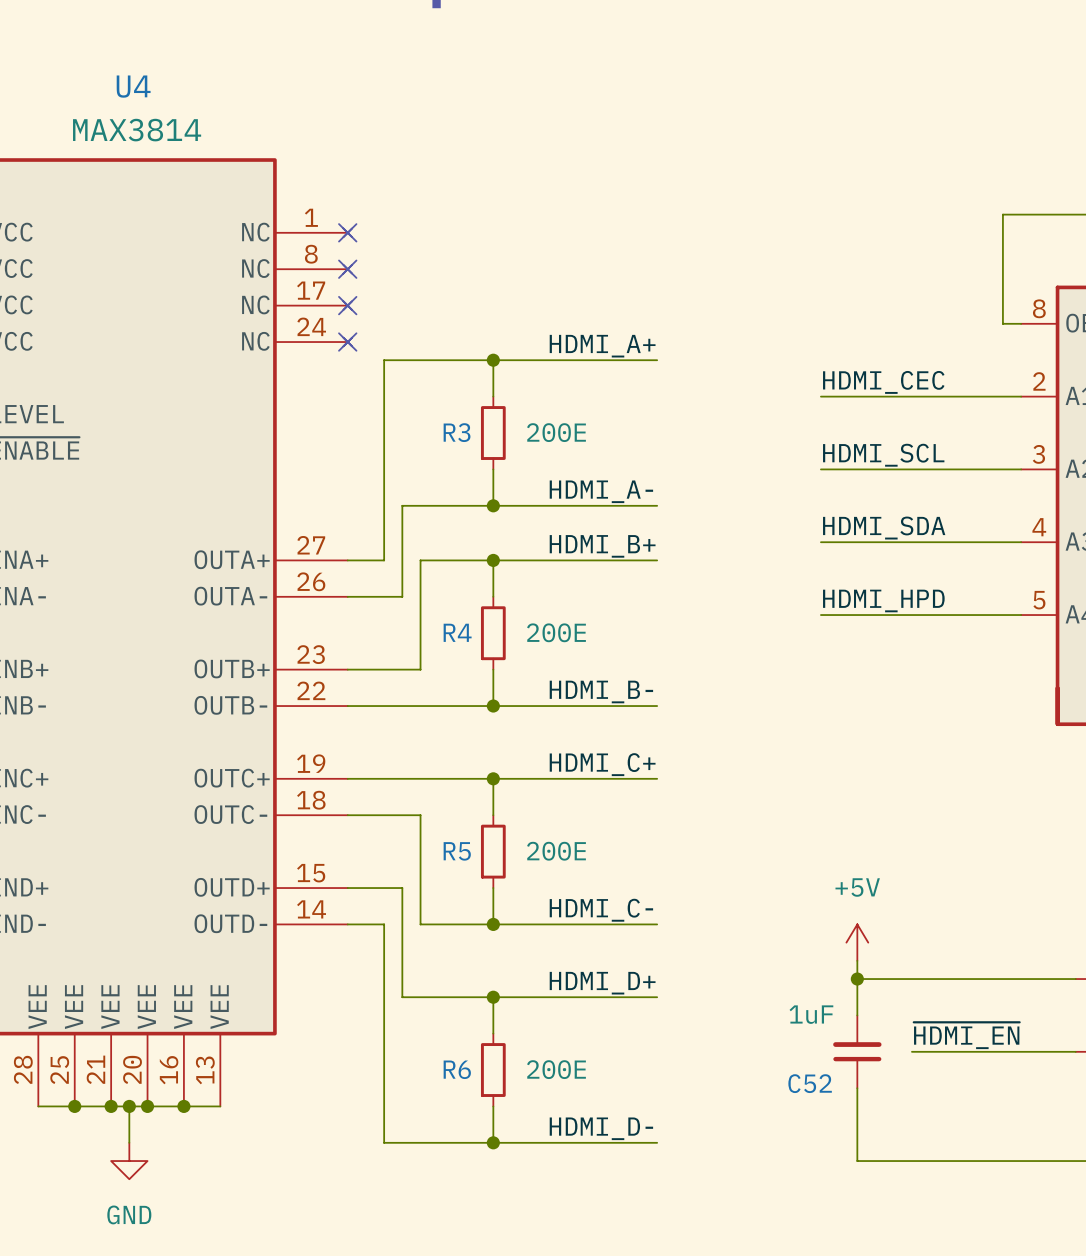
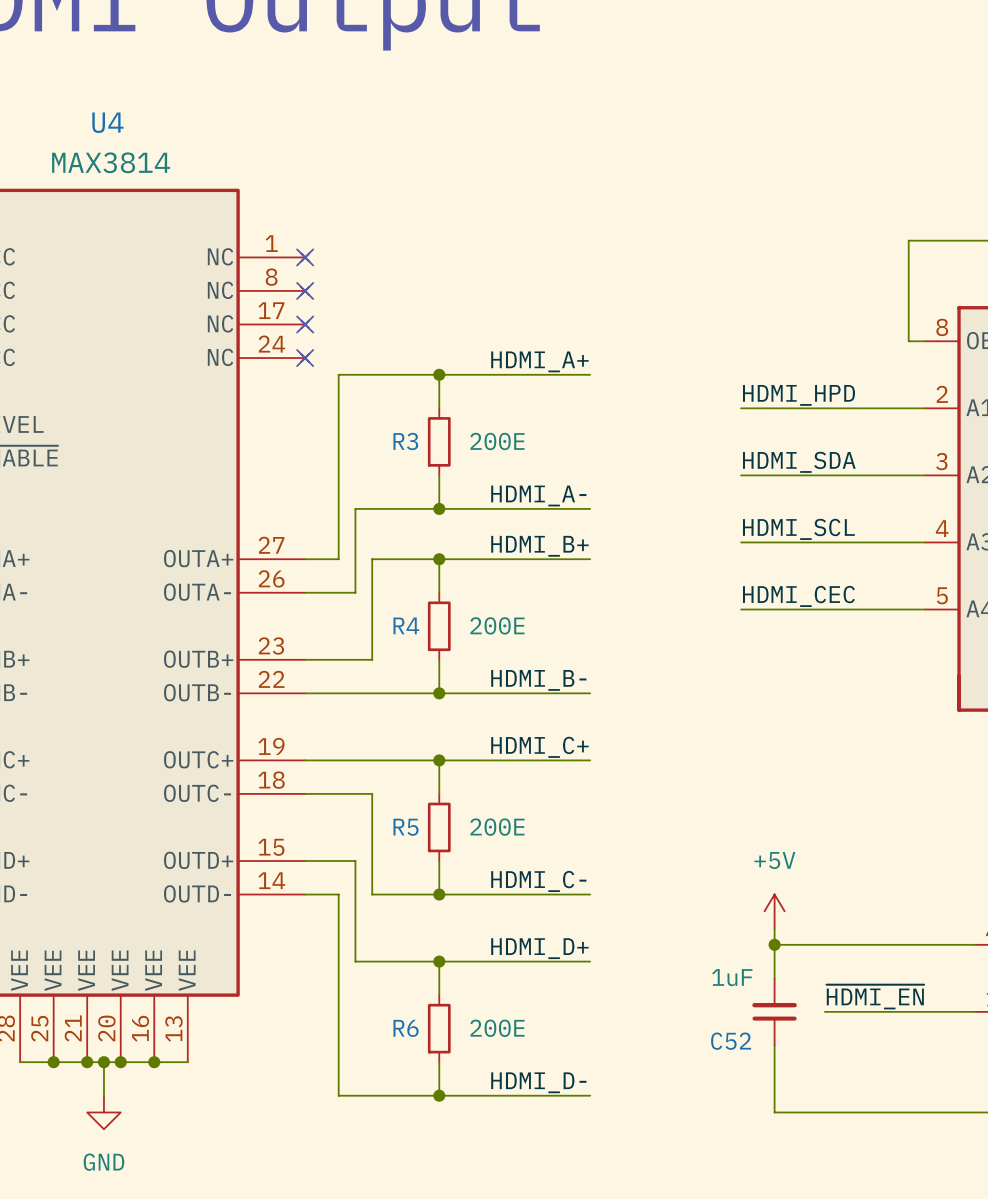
label: HDMI_CEC (883, 382) -> HDMI_HPD (798, 395)
label: HDMI_SCL (883, 455) -> HDMI_SDA (799, 462)
label: HDMI_SDA (884, 528) -> HDMI_SCL (798, 529)
label: HDMI_HPD (883, 600) -> HDMI_CEC (798, 596)

